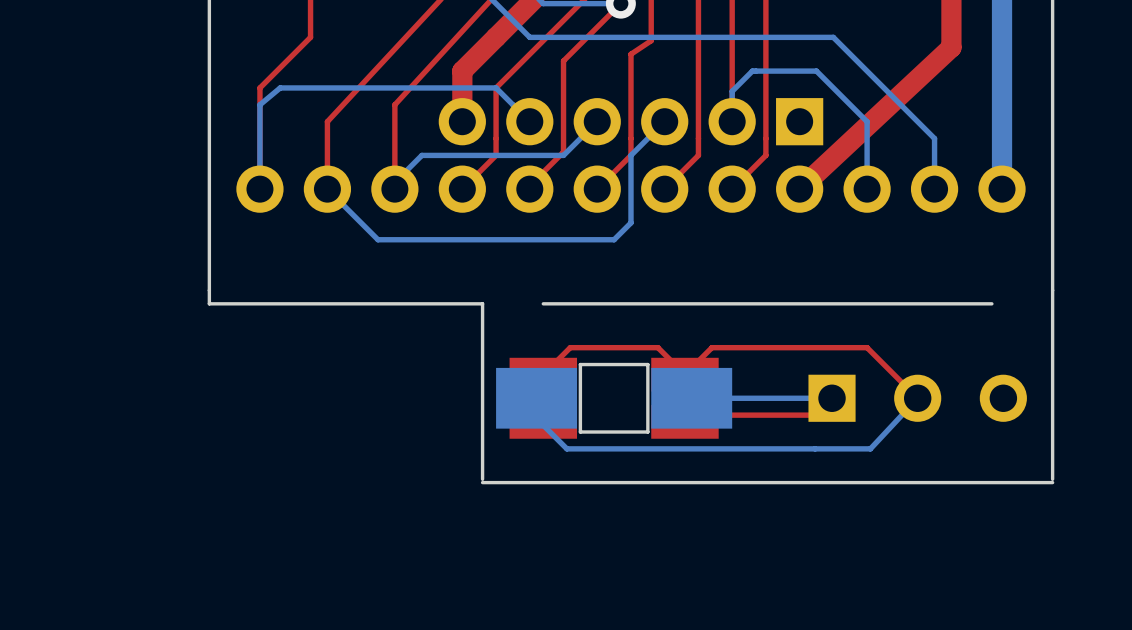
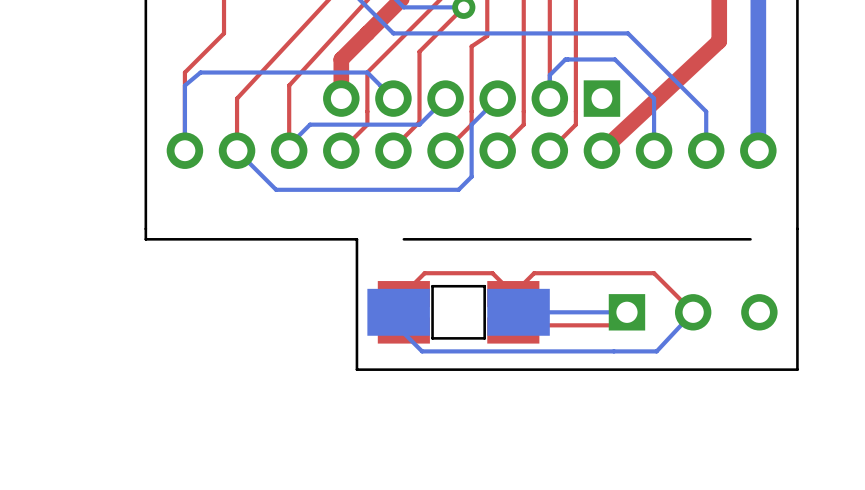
board edge: (482, 472) (482, 479) -> none
board edge: (1052, 472) (1052, 479) -> (797, 369) (356, 369)
board edge: (1052, 482) (482, 482) -> none

